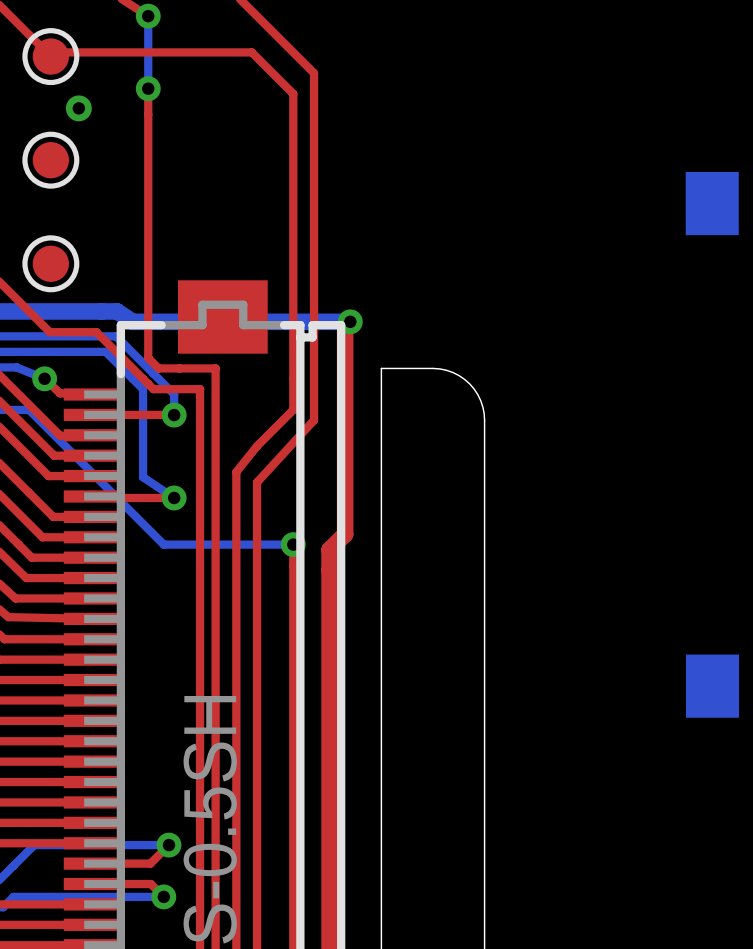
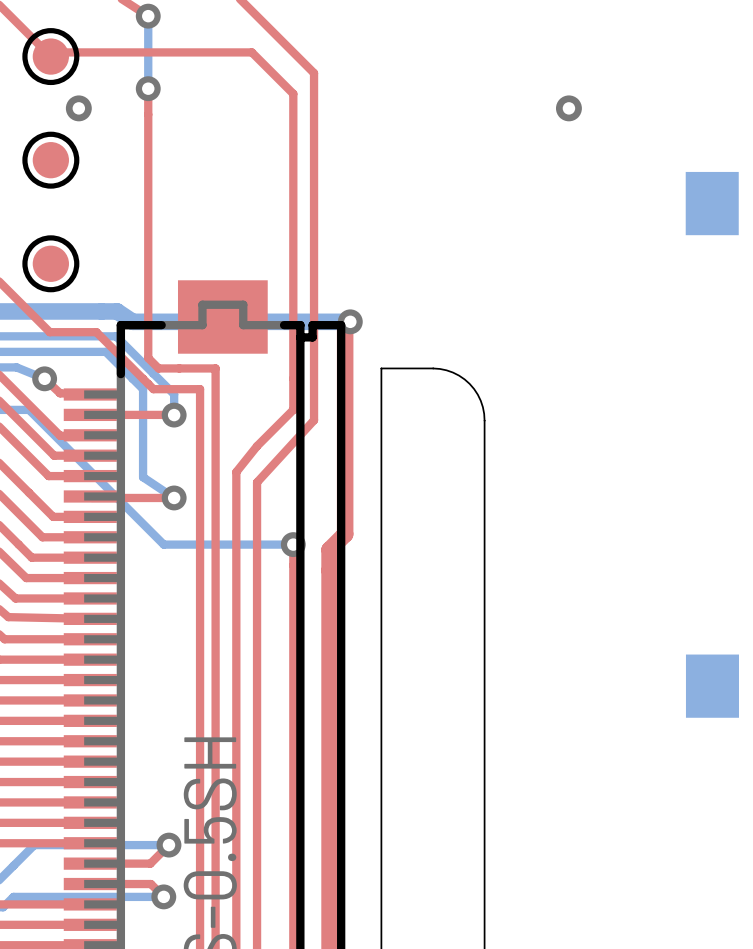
via: none -> (568, 108)

